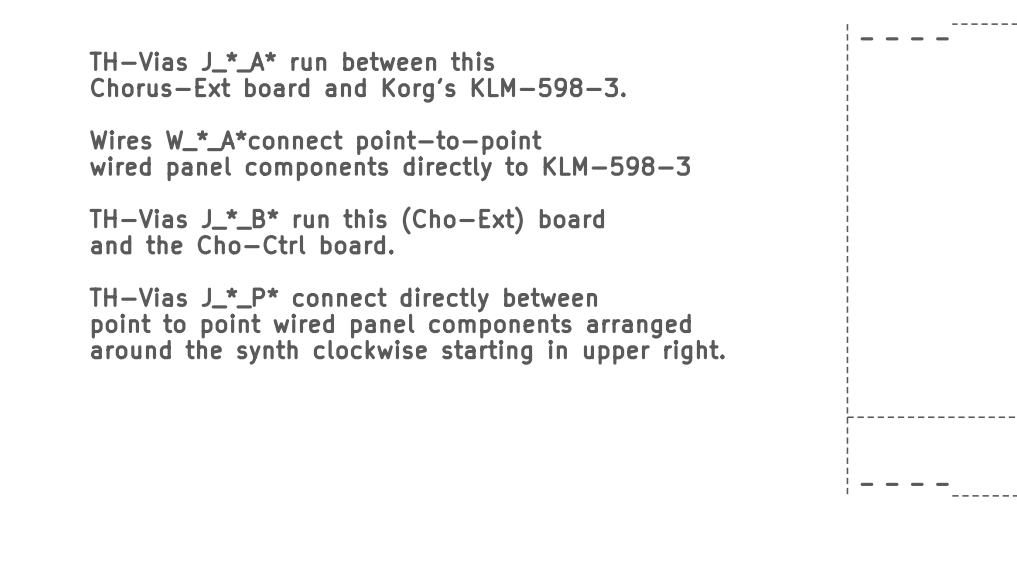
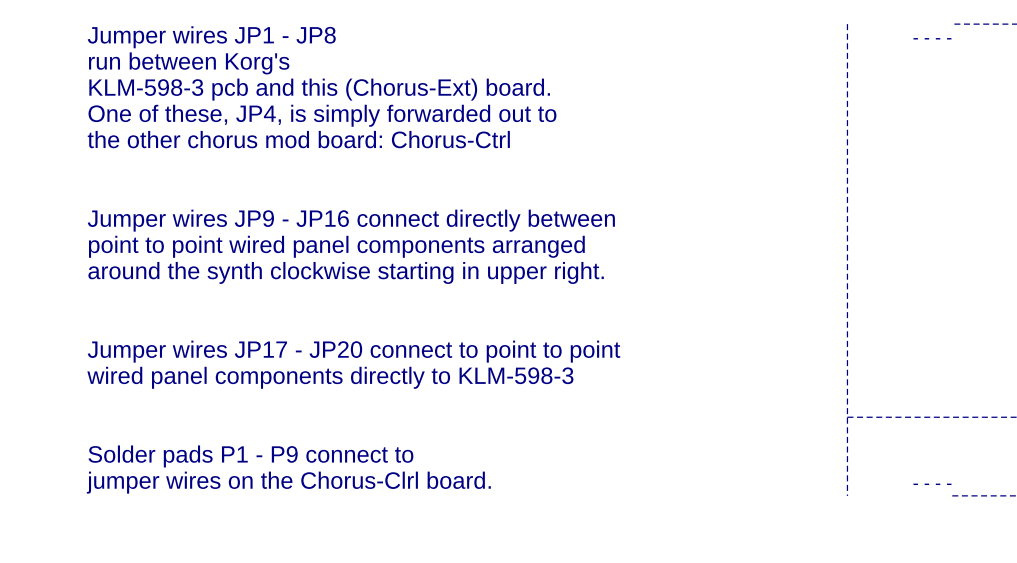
text: none -> Jumper wires JP1 - JP8 (211, 37)
text: TH-Vias J_*_A* run between this (291, 62) -> run between Korg's (189, 63)
text: Chorus-Ext board and Korg's KLM-598-3. (358, 90) -> KLM-598-3 pcb and this (Chorus-Ext) board. (319, 89)
text: none -> One of these, JP4, is simply forwarded out to (322, 115)
text: Wires W_*_A*connect point-to-point (315, 142) -> the other chorus mod board: Chorus-Ctrl (298, 139)
text position: wired panel components directly to KLM-598-3 (390, 168) -> wired panel components directly to KLM-598-3 (330, 377)
text: TH-Vias J_*_B* run this (Cho-Ext) board (346, 220) -> Jumper wires JP9 - JP16 connect directly between (351, 220)
text: and the Cho-Ctrl board. (242, 244) -> point to point wired panel components arranged (336, 246)
text: none -> around the synth clockwise starting in upper right. (346, 272)
text: TH-Vias J_*_P* connect directly between (343, 299) -> none
text: point to point wired panel components arranged (391, 326) -> none
text: around the synth clockwise starting in upper right. (407, 352) -> Jumper wires JP17 - JP20 connect to point to point (354, 351)
text: none -> Solder pads P1 - P9 connect to (250, 456)
text: none -> jumper wires on the Chorus-Clrl board. (288, 482)

